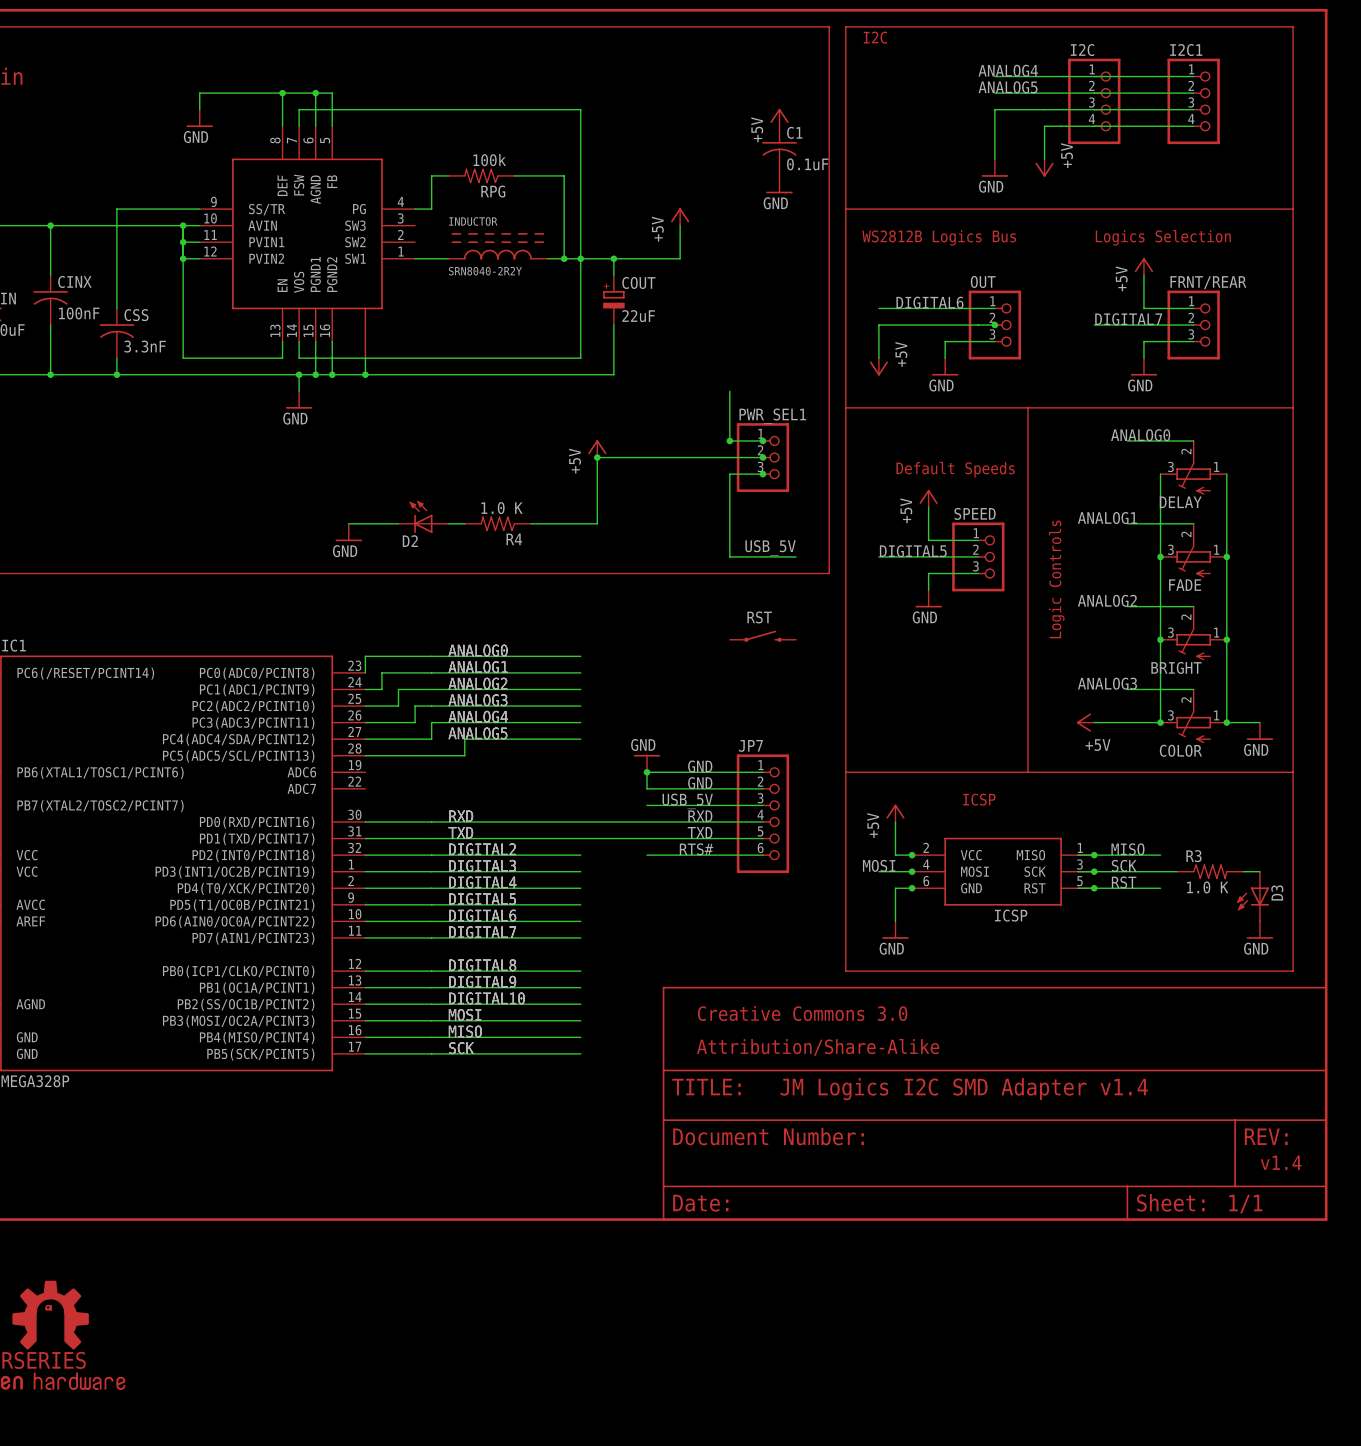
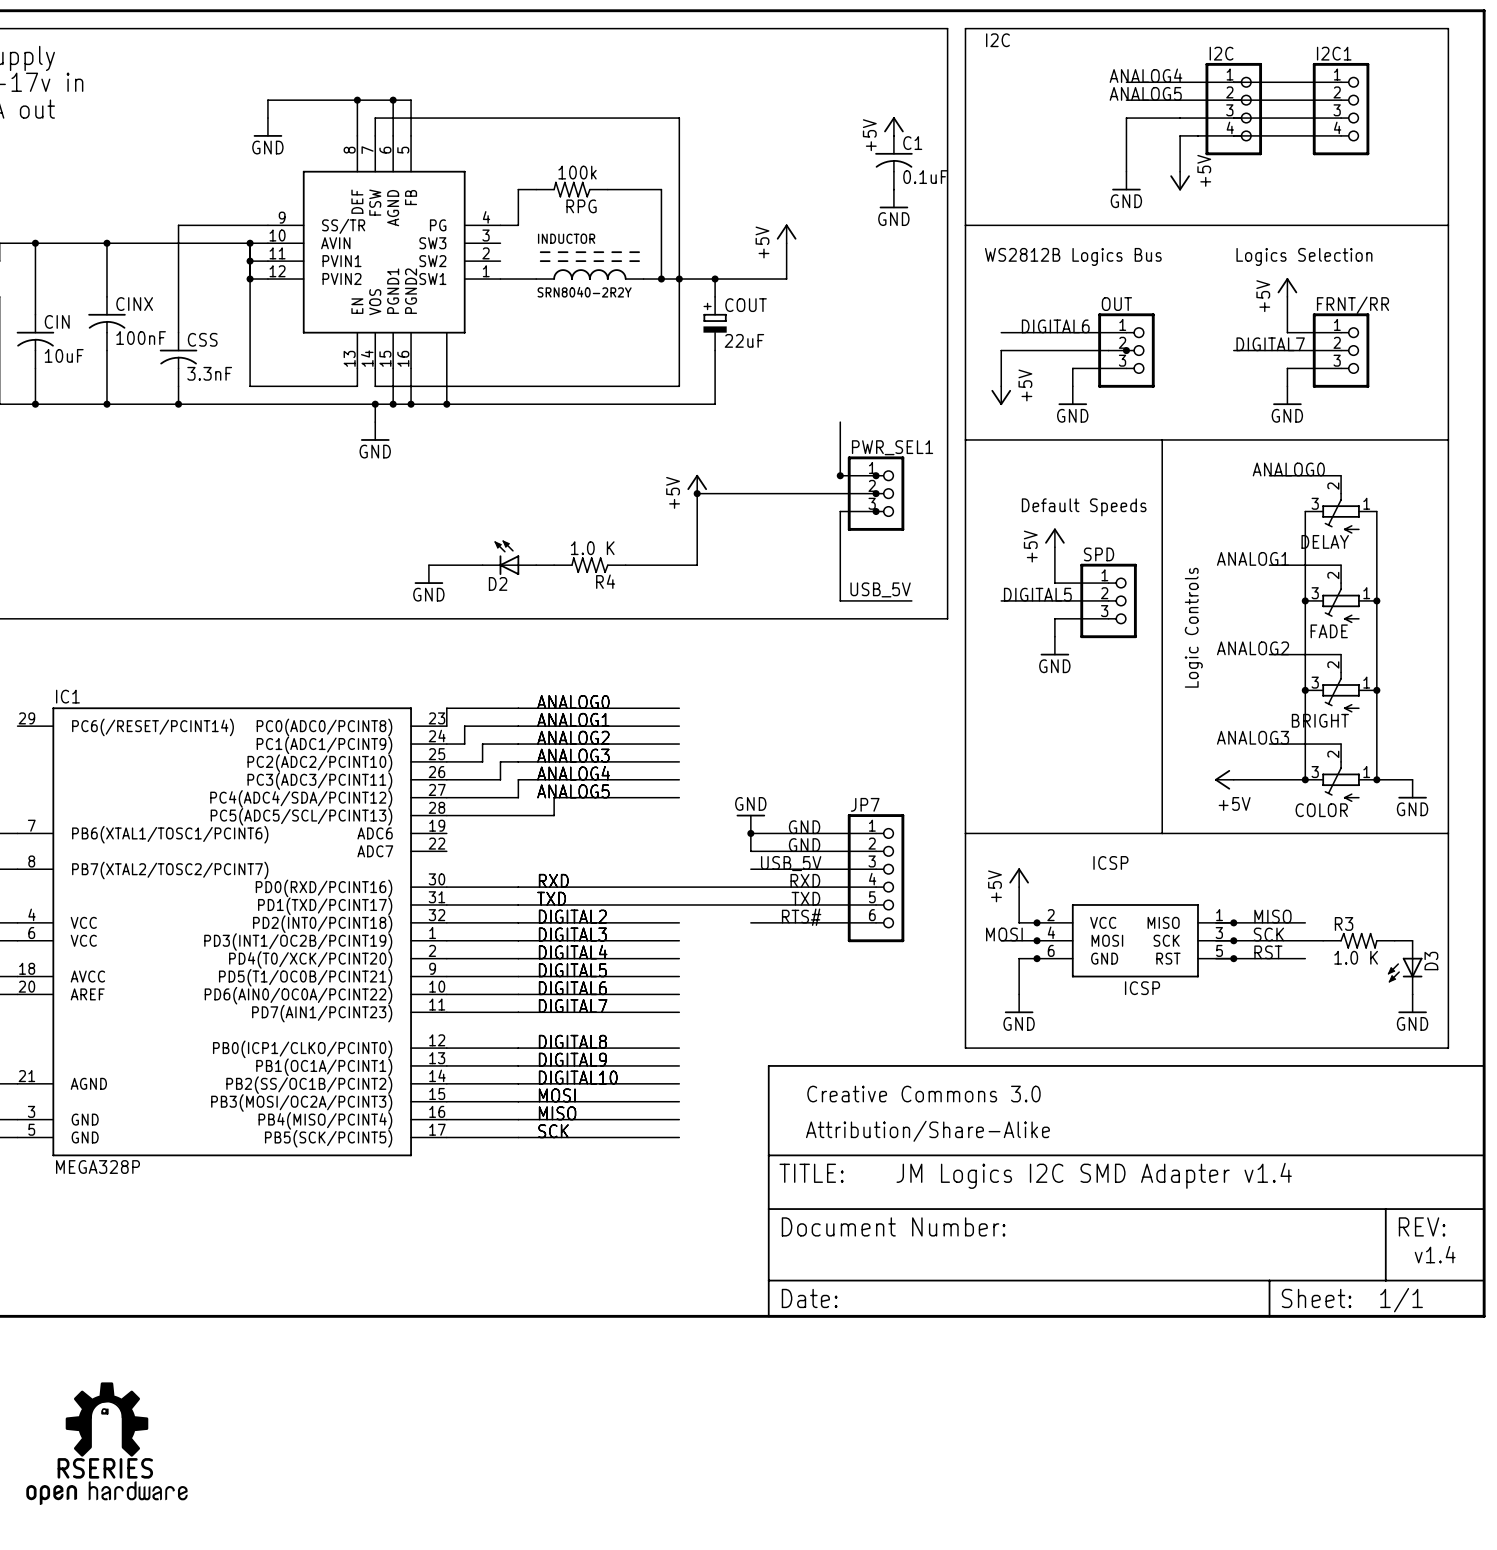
FRNT/REAR name: FRNT/REAR (1208, 282) -> FRNT/RR (1352, 305)
SPEED name: SPEED (975, 513) -> SPD (1099, 554)
RST: (762, 636) -> none

